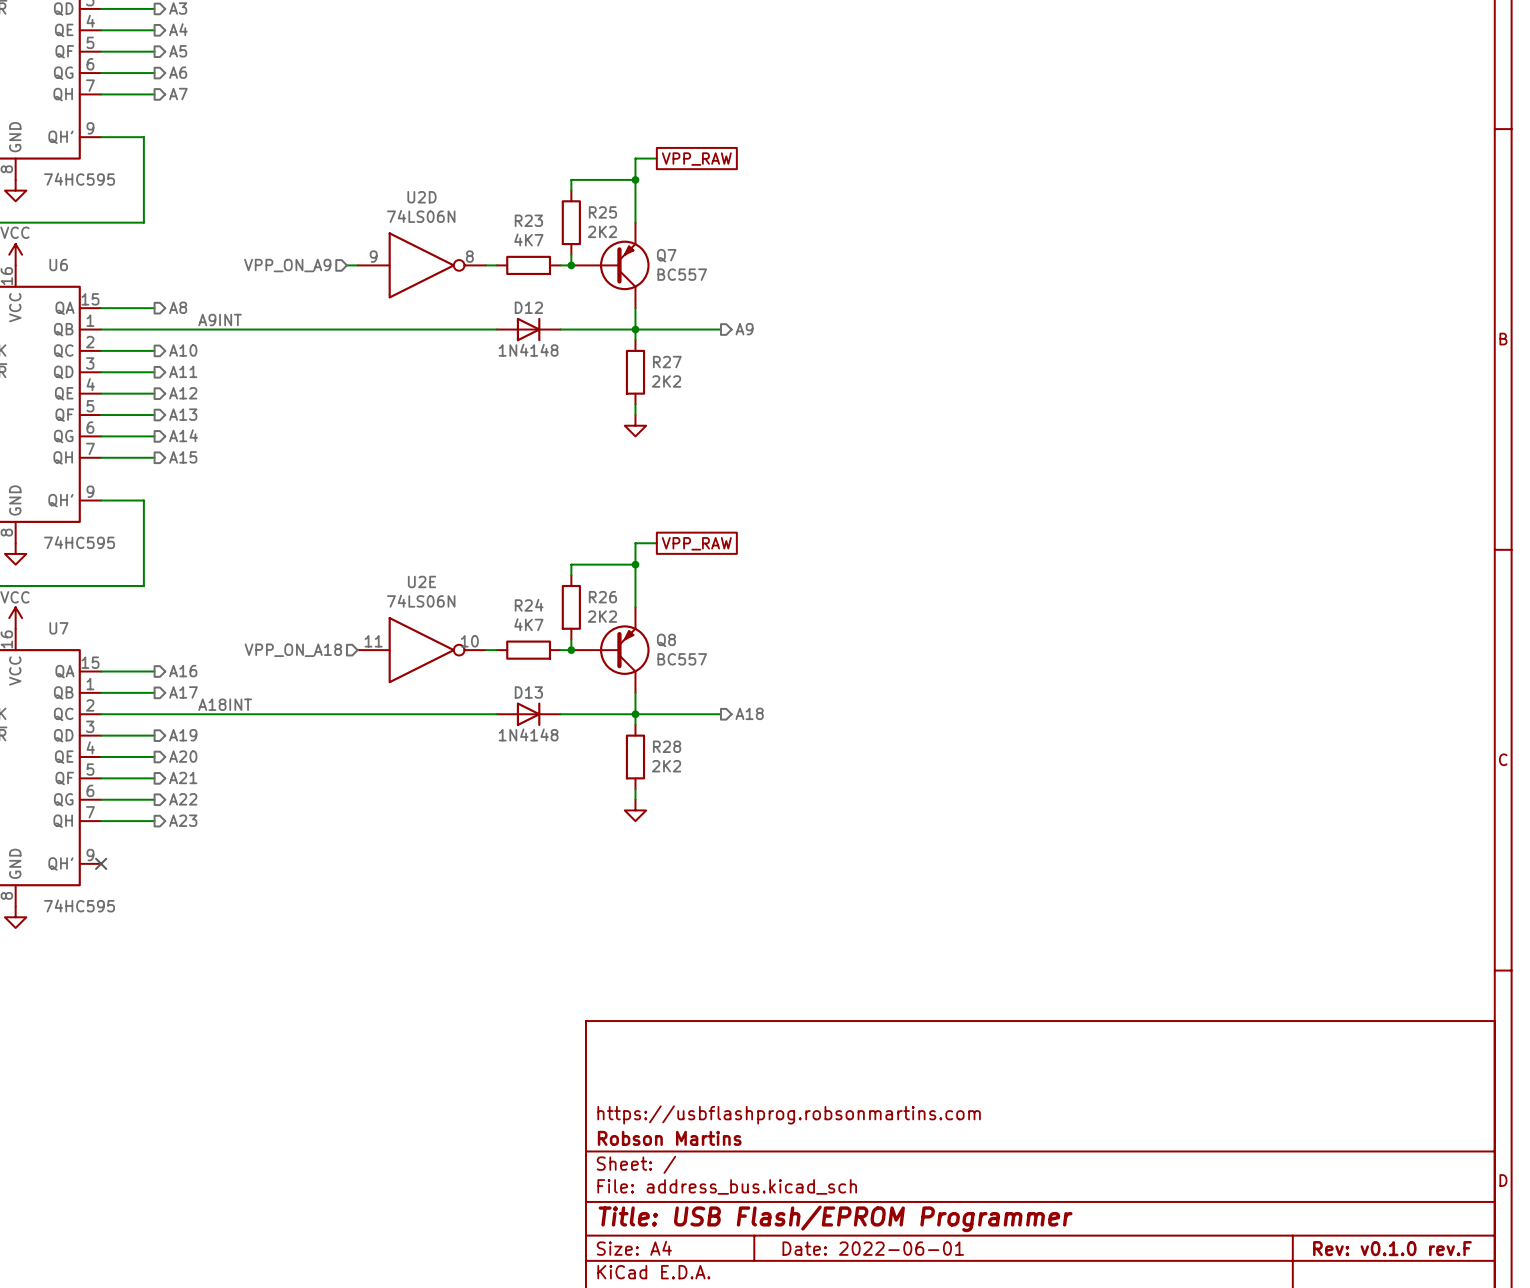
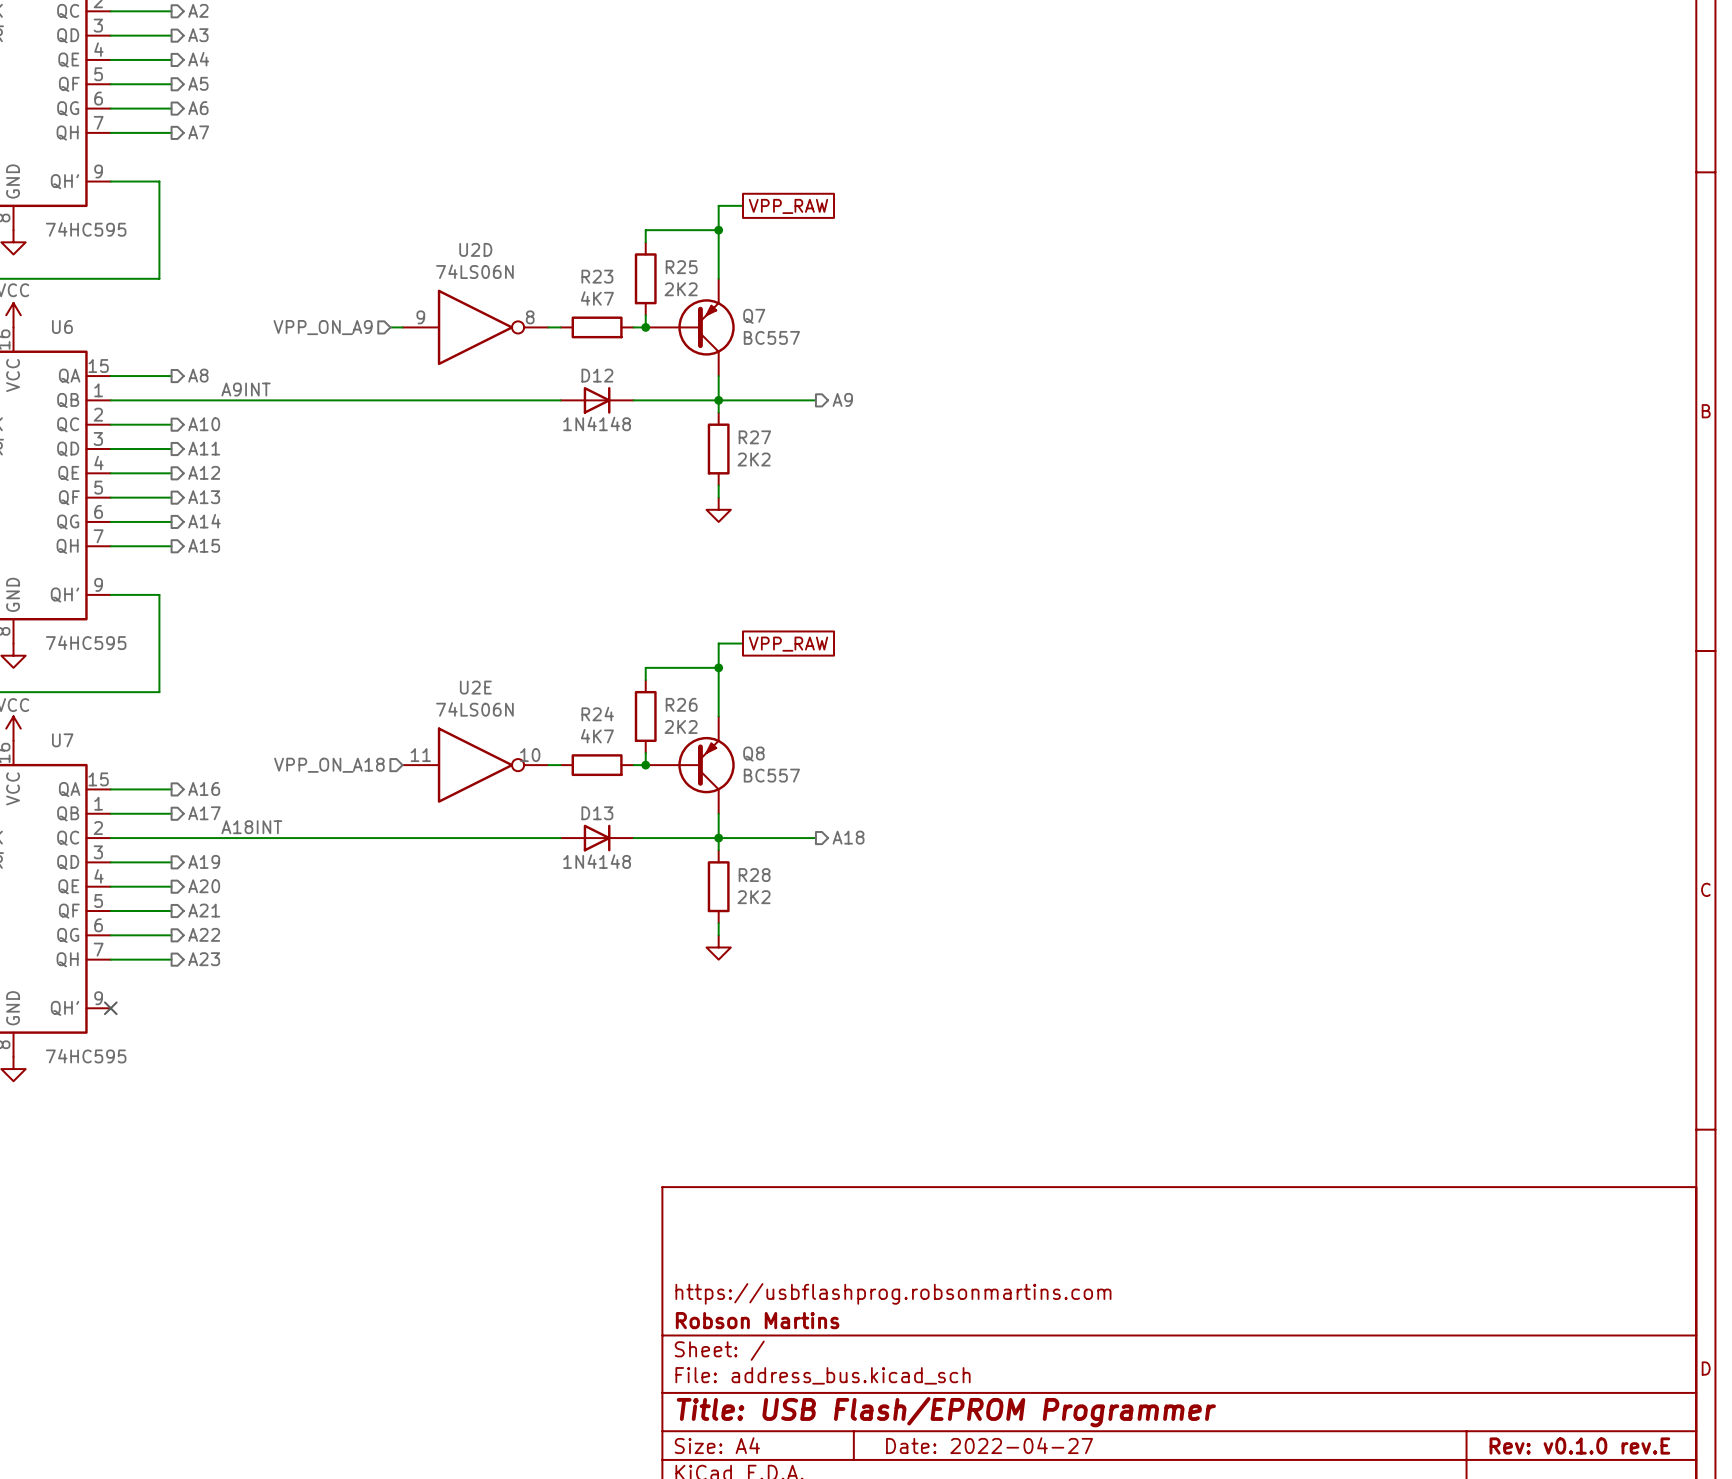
title block: Date: 2022-06-01 (873, 1248) -> Date: 2022-04-27 (989, 1445)
title block: Rev: v0.1.0 rev.F (1392, 1248) -> Rev: v0.1.0 rev.E (1579, 1446)

